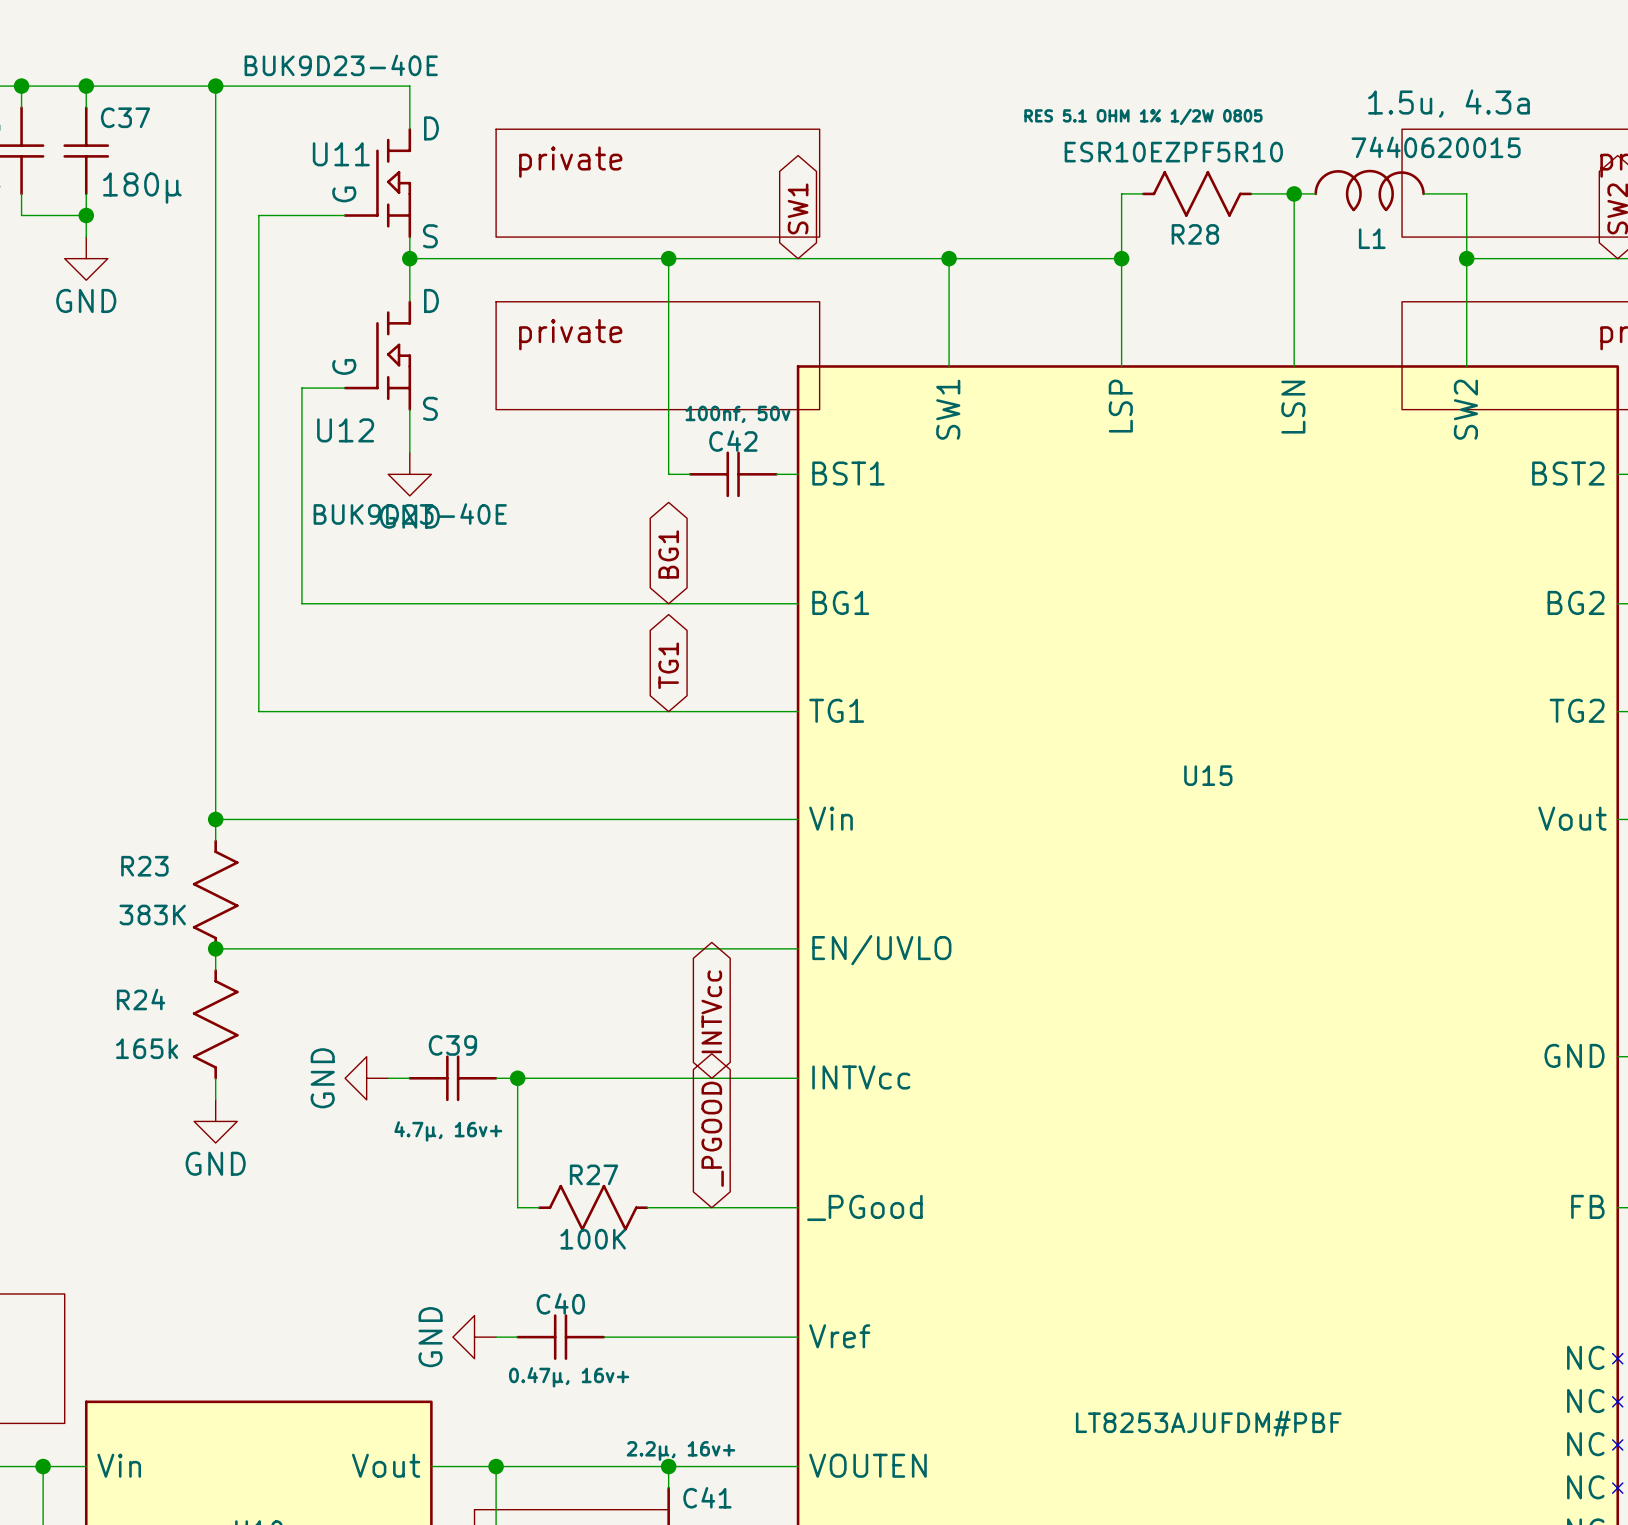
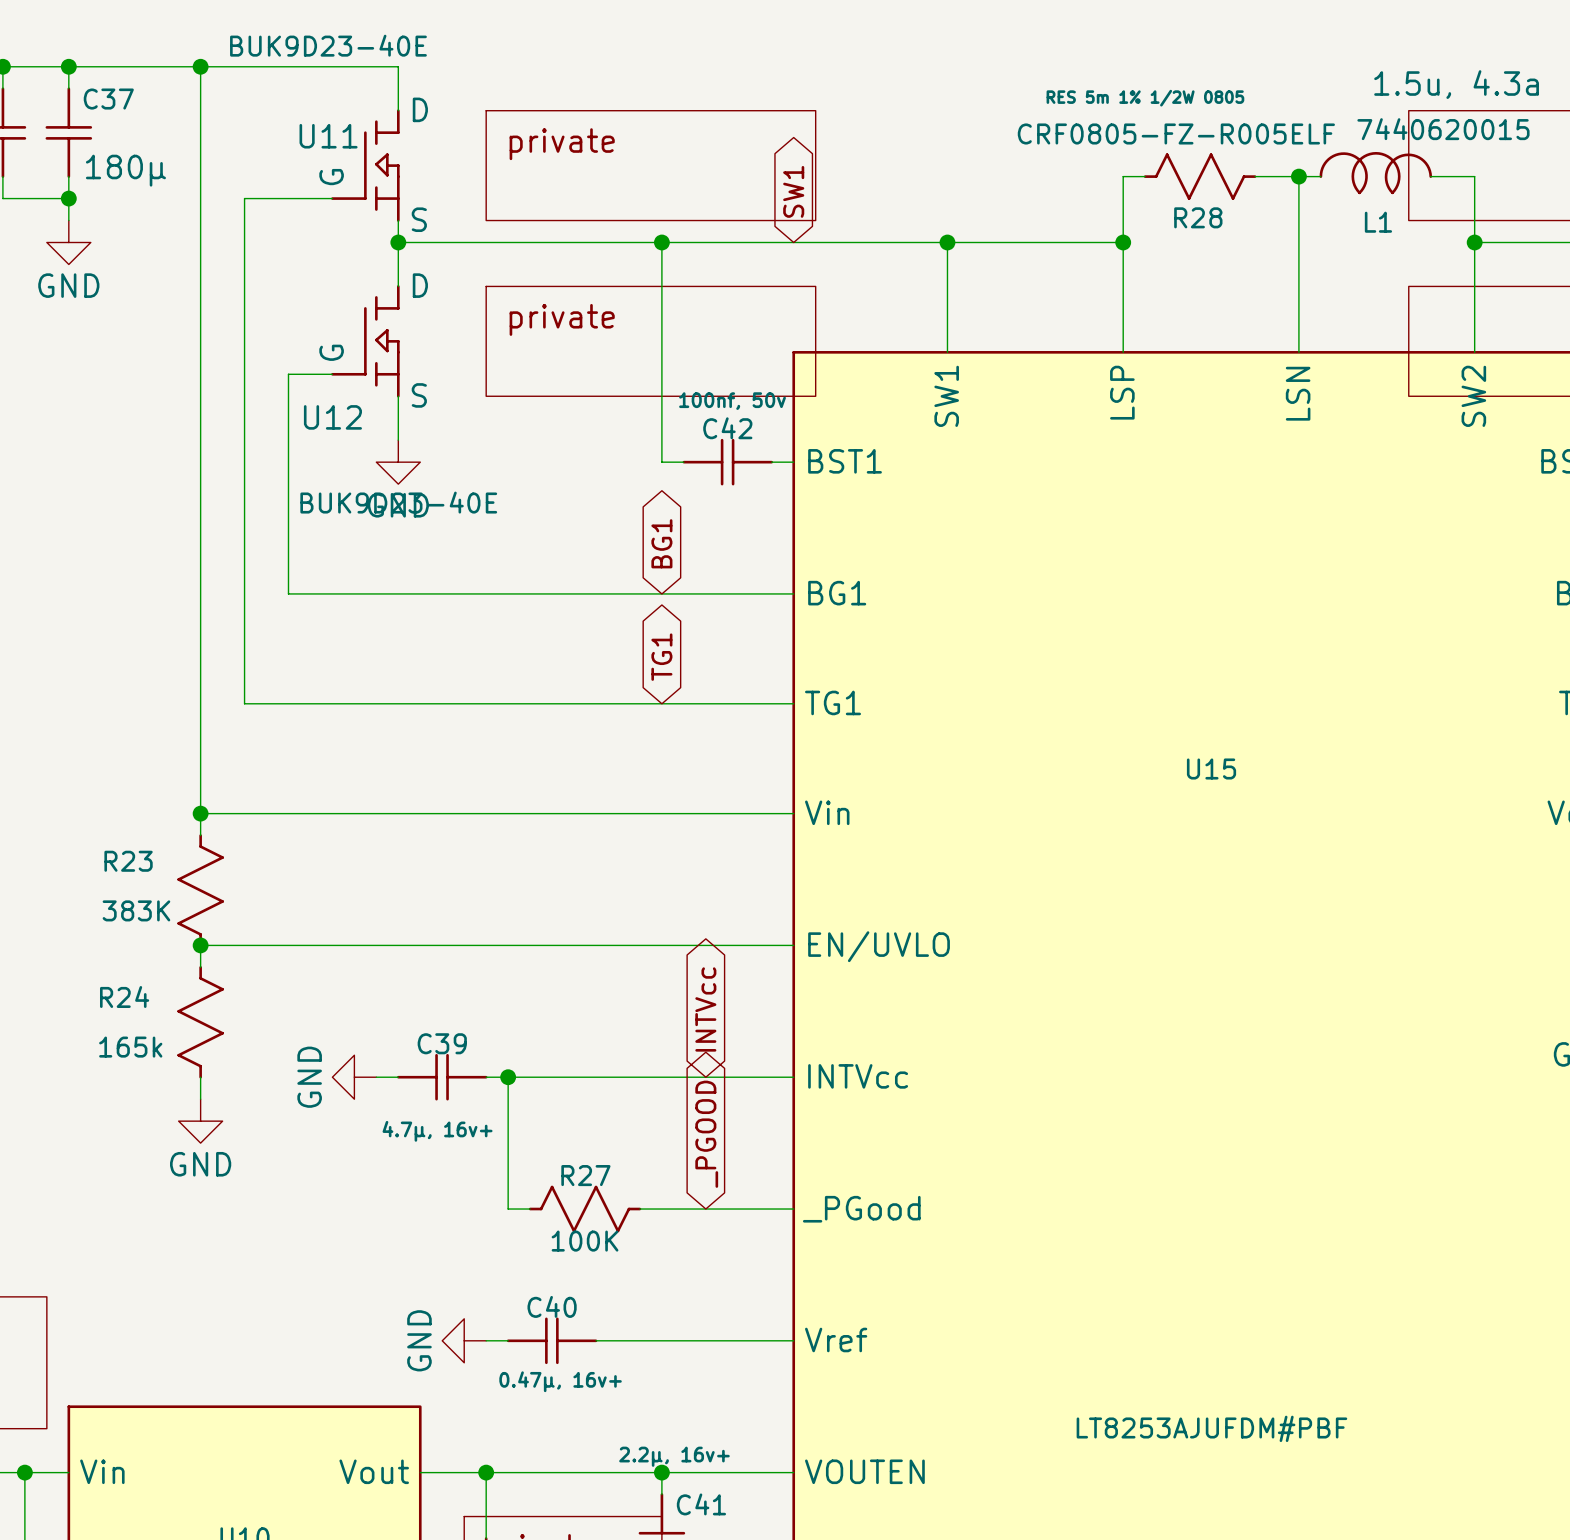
R28 text: RES 5.1 OHM 1% 1/2W 0805 (1143, 116) -> RES 5m 1% 1/2W 0805 (1145, 98)
R28 value: ESR10EZPF5R10 (1173, 152) -> CRF0805-FZ-R005ELF (1176, 133)

